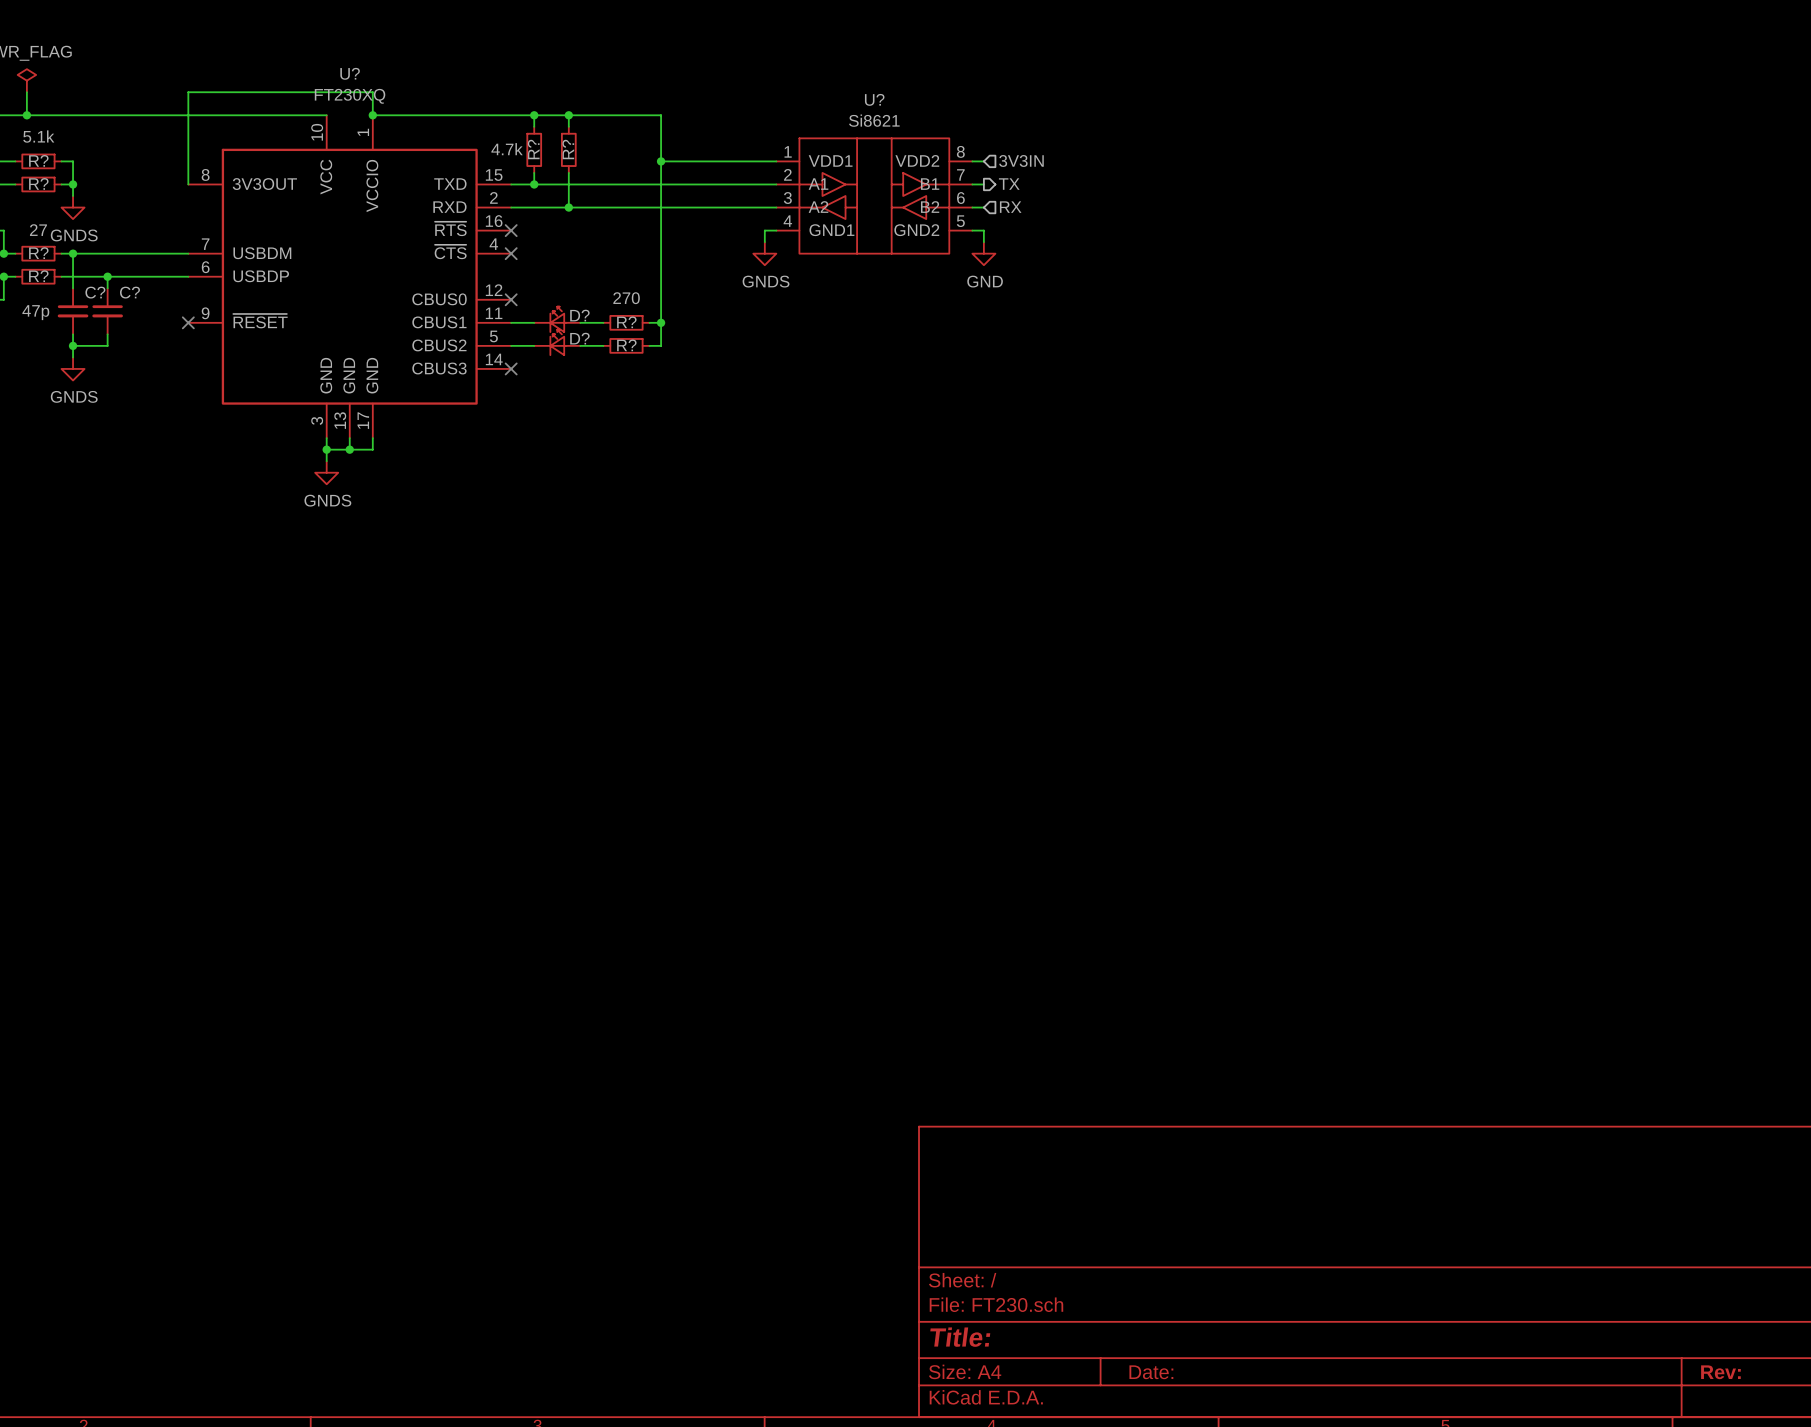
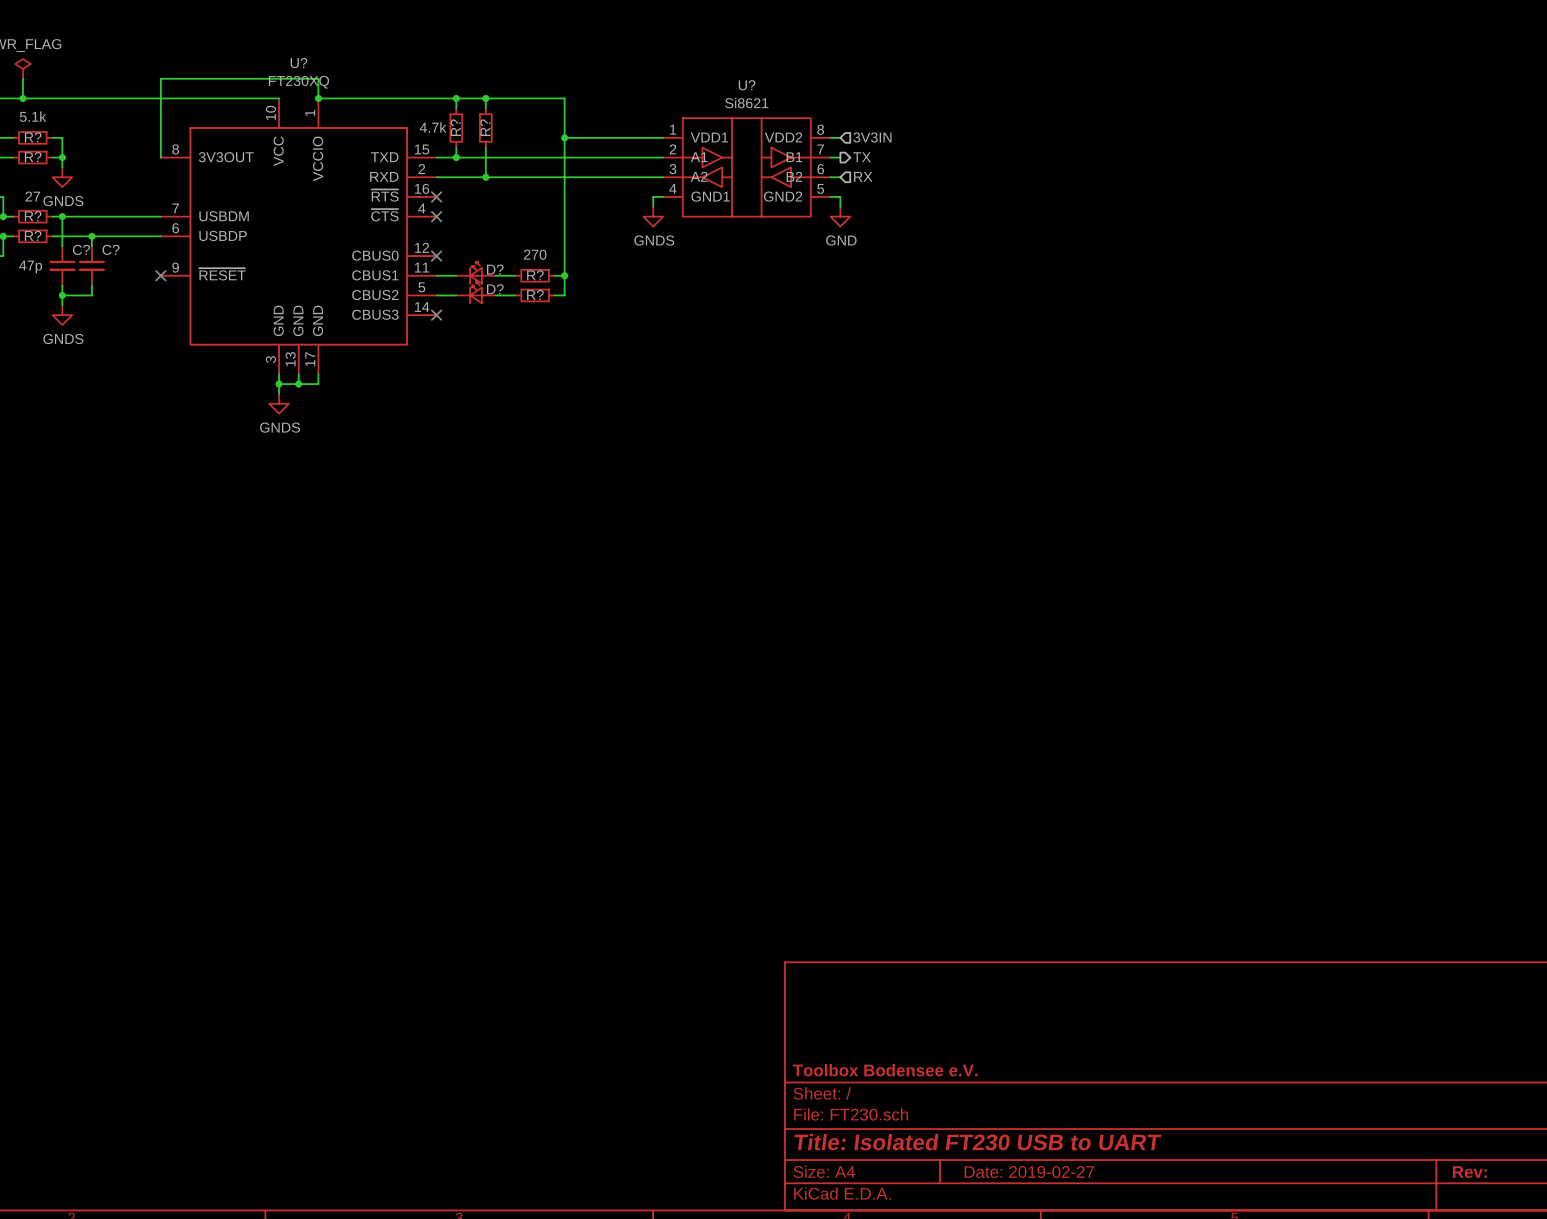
title block: none -> Toolbox Bodensee e.V. (885, 1070)
title block: Title: (960, 1337) -> Title: Isolated FT230 USB to UART (977, 1142)
title block: Date: (1151, 1372) -> Date: 2019-02-27 (1029, 1172)

